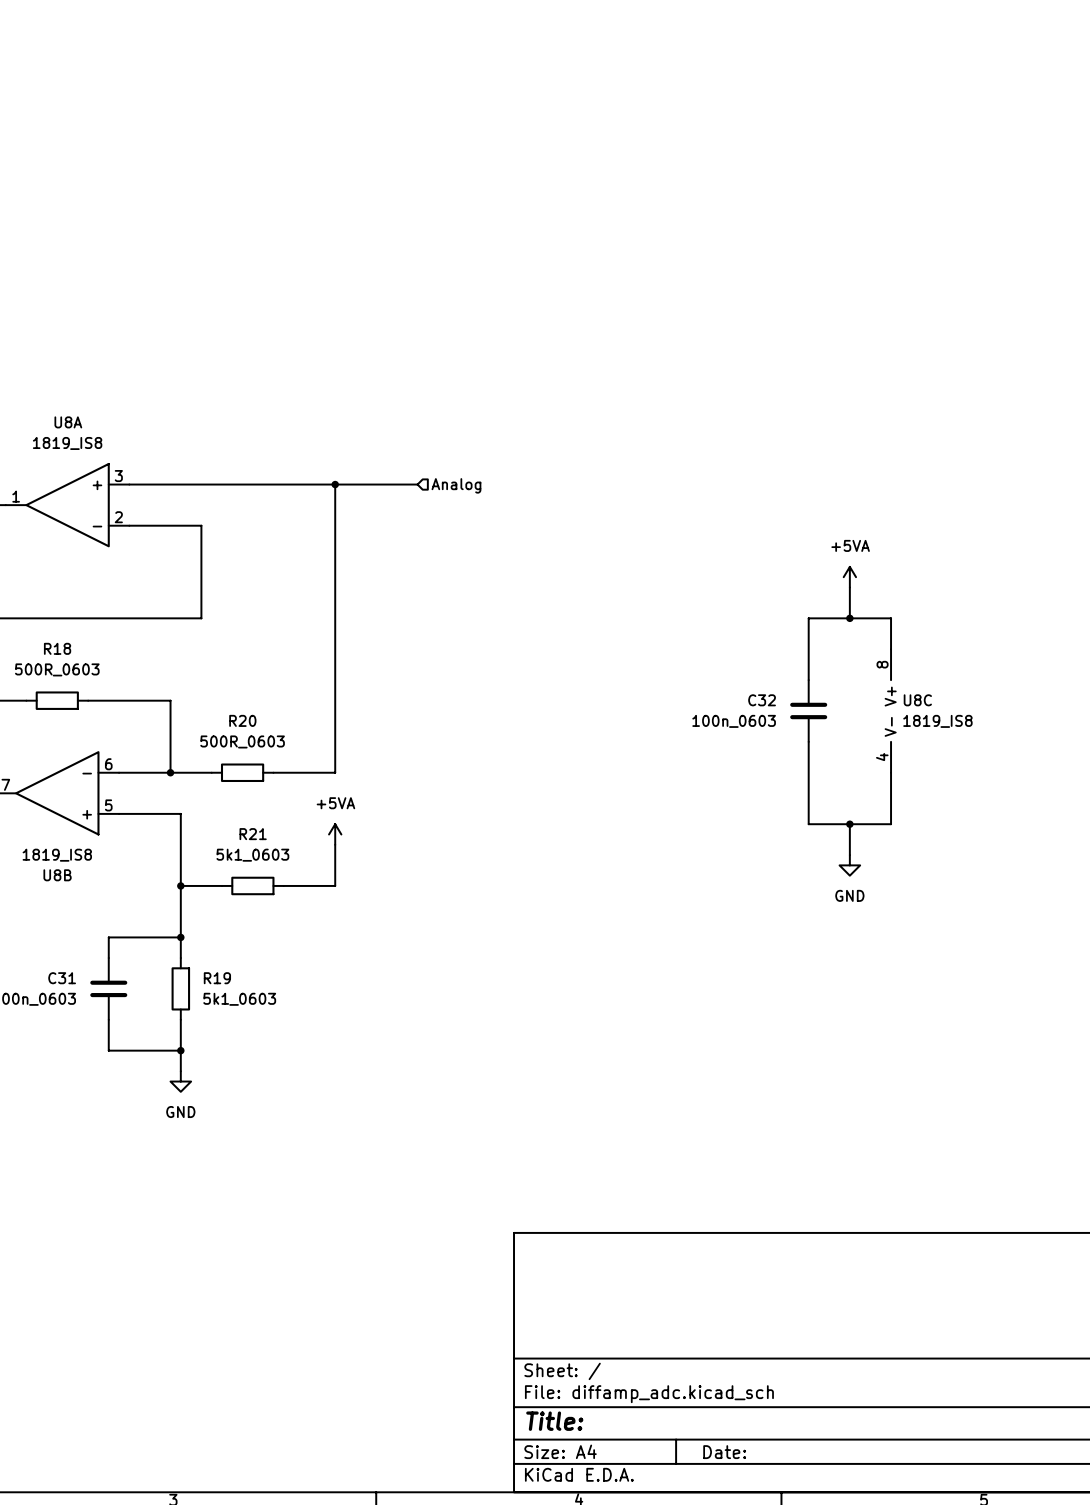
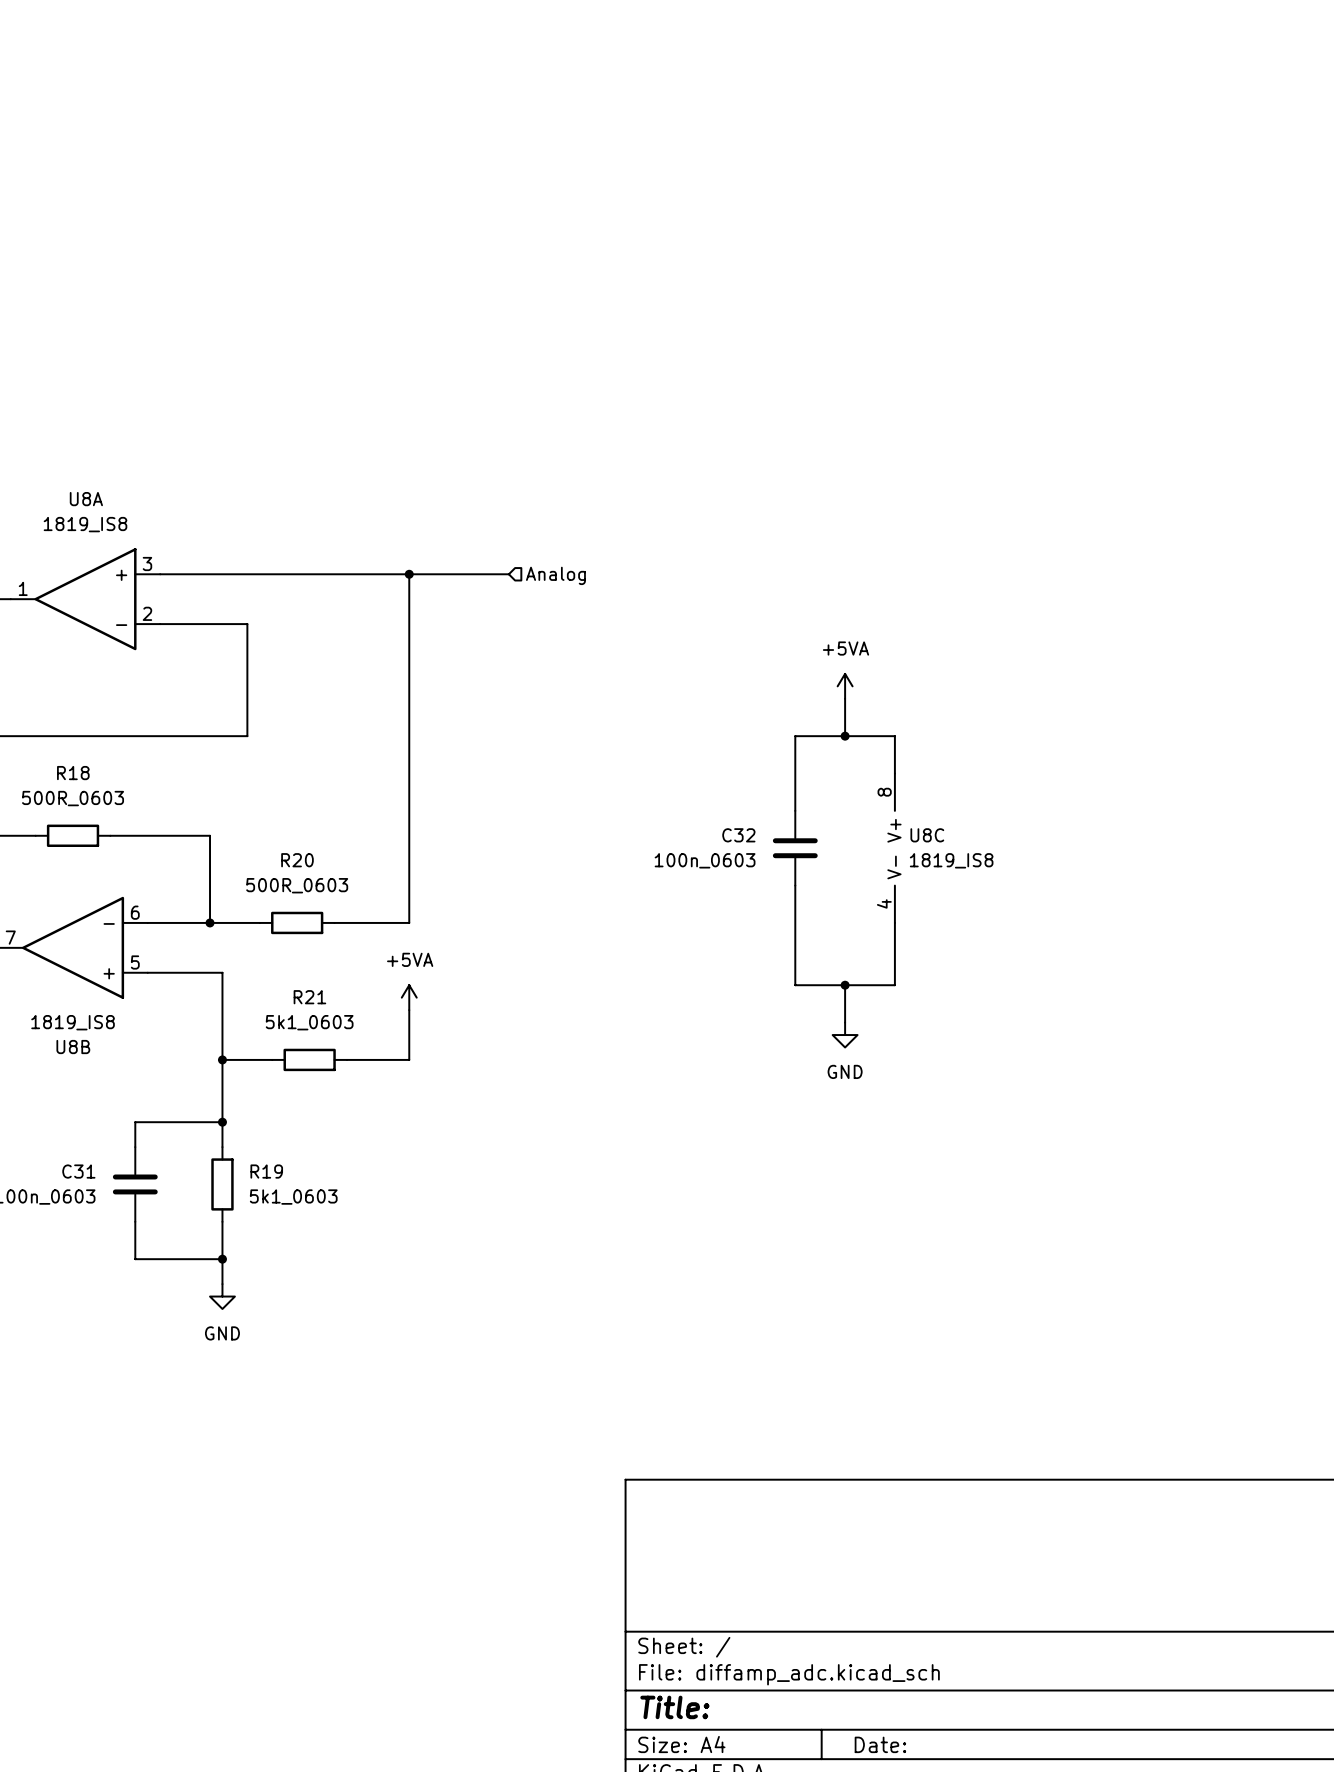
power symbol position: +5VA (849, 577) -> +5VA (845, 686)
wire: (849, 587) (849, 618) -> (845, 698) (845, 736)
junction: none -> (845, 736)
junction: (849, 618) -> none
wire: (891, 649) (891, 618) (808, 618) (808, 680) -> (894, 773) (894, 736) (795, 736) (795, 810)
C32 position: (808, 710) -> (795, 848)
U8C position: (891, 710) -> (894, 848)
wire: (808, 741) (808, 824) (891, 824) (891, 772) -> (795, 885) (795, 985) (894, 985) (894, 922)
junction: none -> (845, 985)
wire: (849, 824) (849, 855) -> (845, 985) (845, 1022)
junction: (849, 824) -> none
power symbol position: GND (849, 865) -> GND (845, 1035)

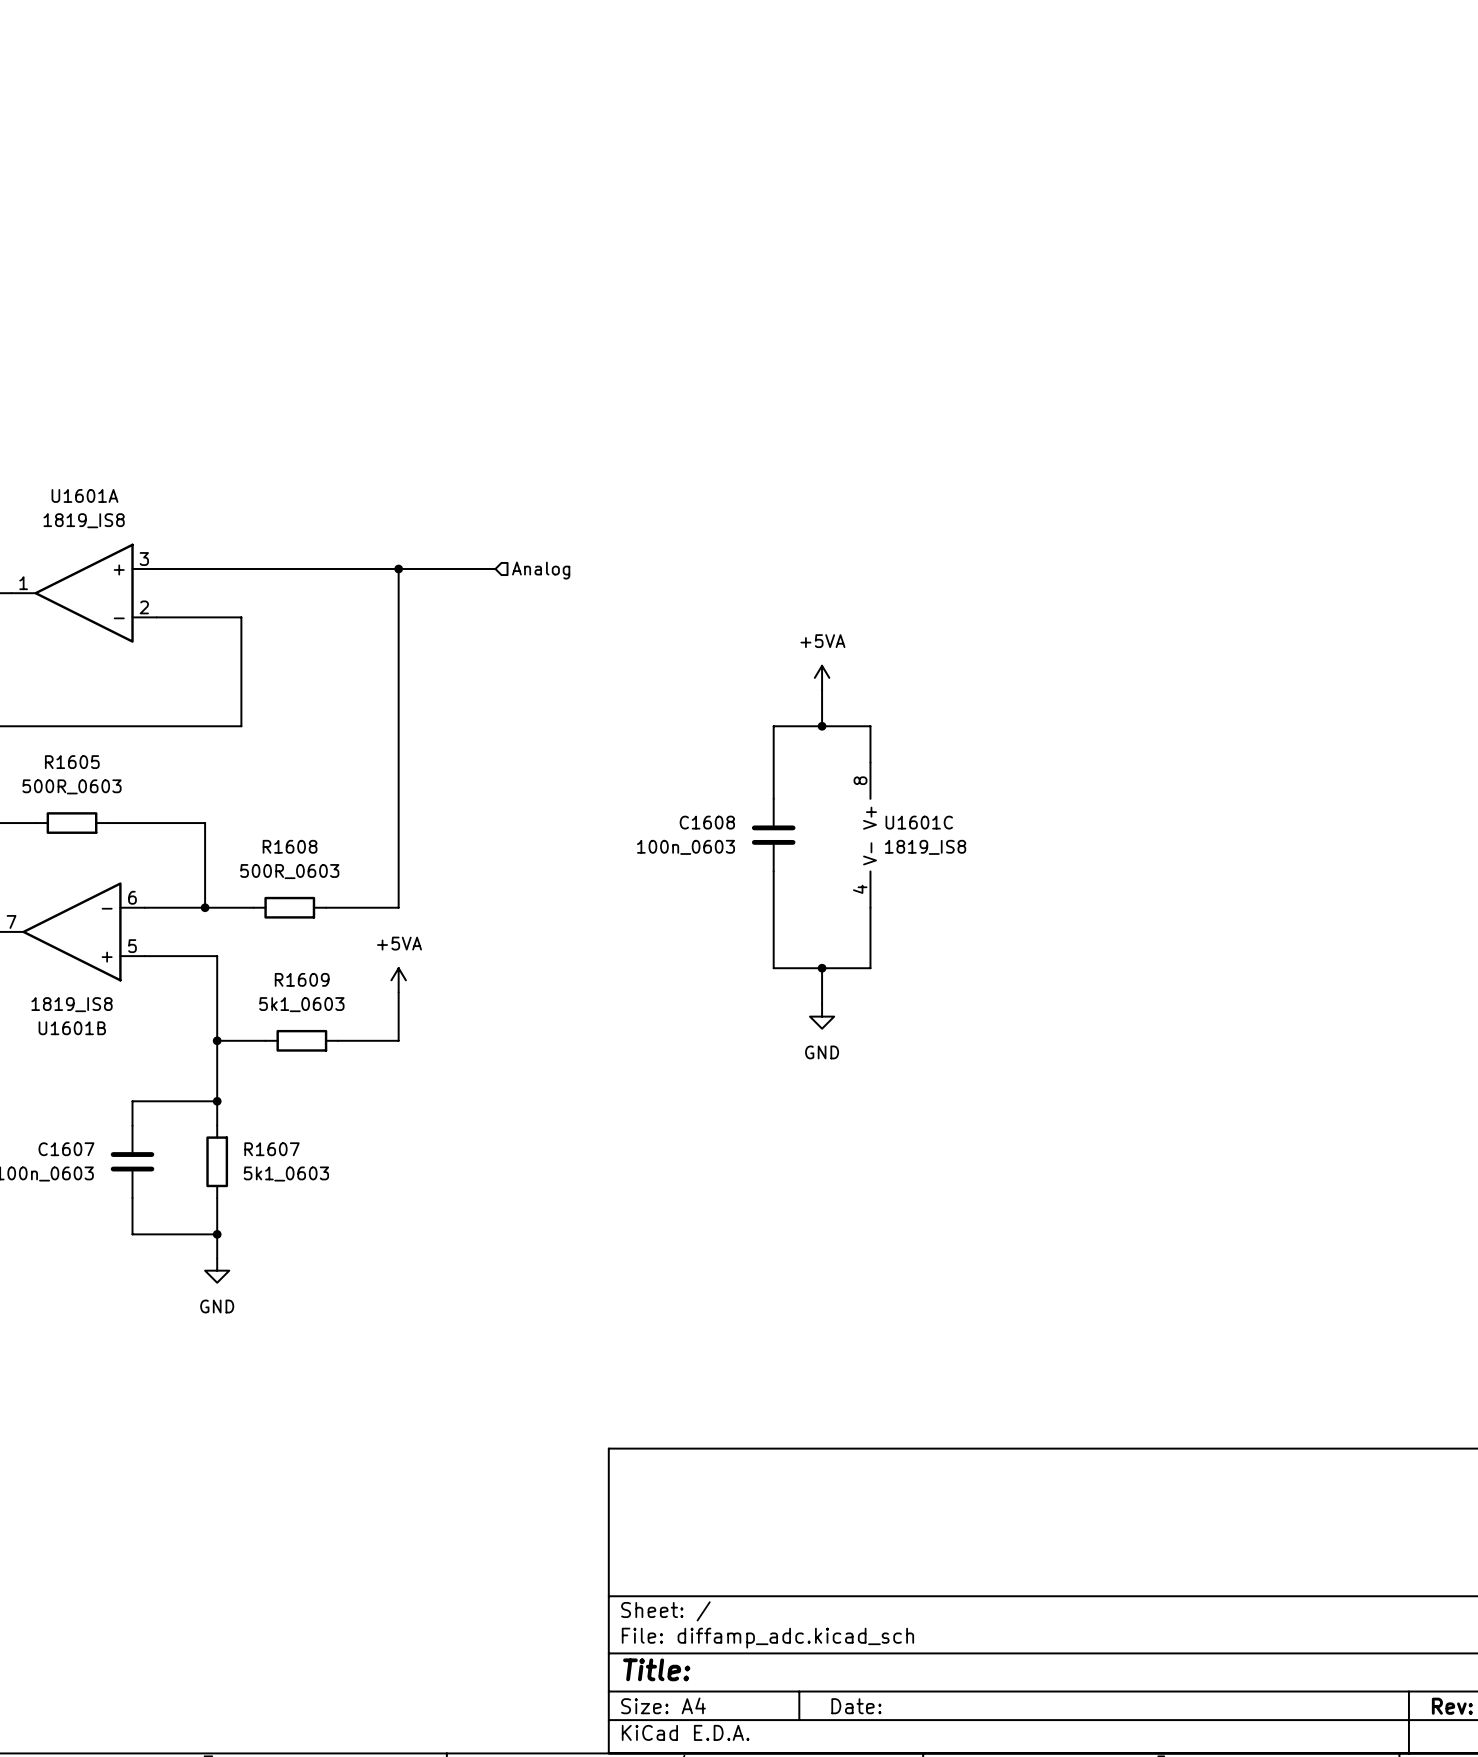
U8A name: U8A (86, 499) -> U1601A (84, 495)
R18 name: R18 (73, 773) -> R1605 (72, 762)
C32 name: C32 (738, 835) -> C1608 (707, 822)
U8C name: U8C (927, 835) -> U1601C (919, 822)
R20 name: R20 (297, 860) -> R1608 (290, 846)
R21 name: R21 (309, 997) -> R1609 (302, 979)
U8B name: U8B (73, 1047) -> U1601B (72, 1028)
C31 name: C31 (78, 1171) -> C1607 (66, 1149)
R19 name: R19 (266, 1171) -> R1607 (272, 1149)

